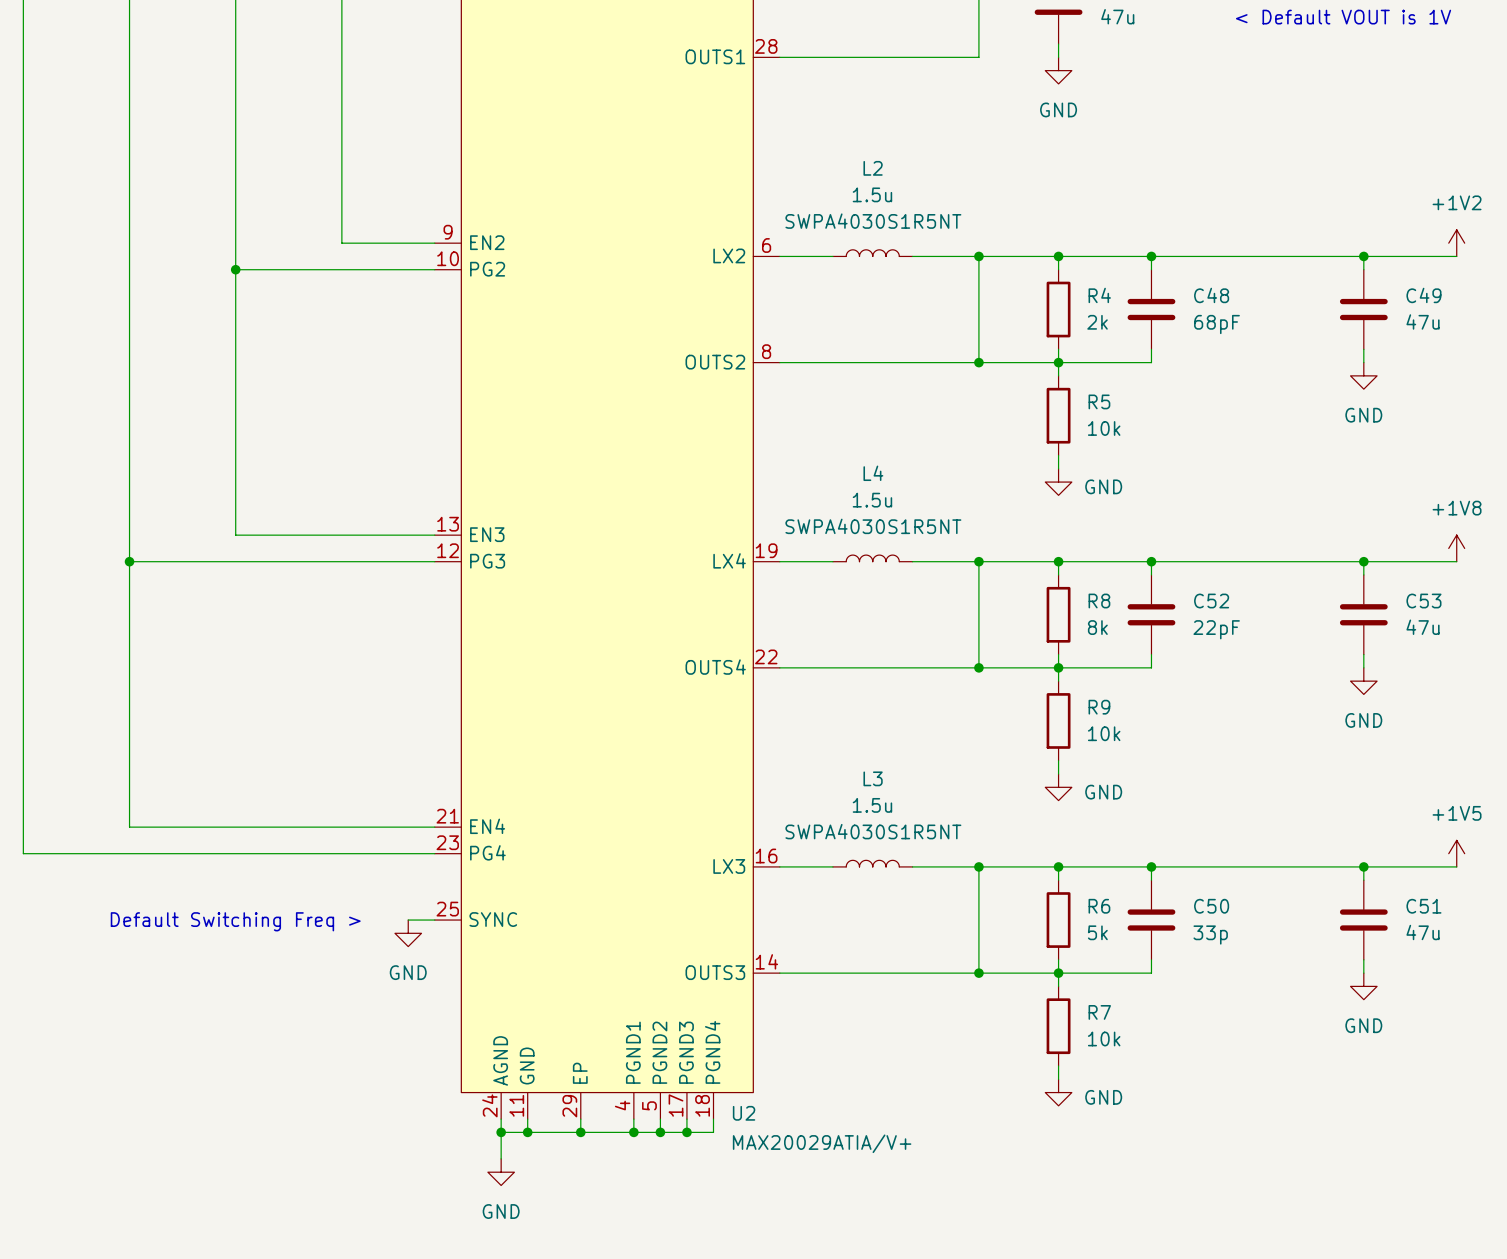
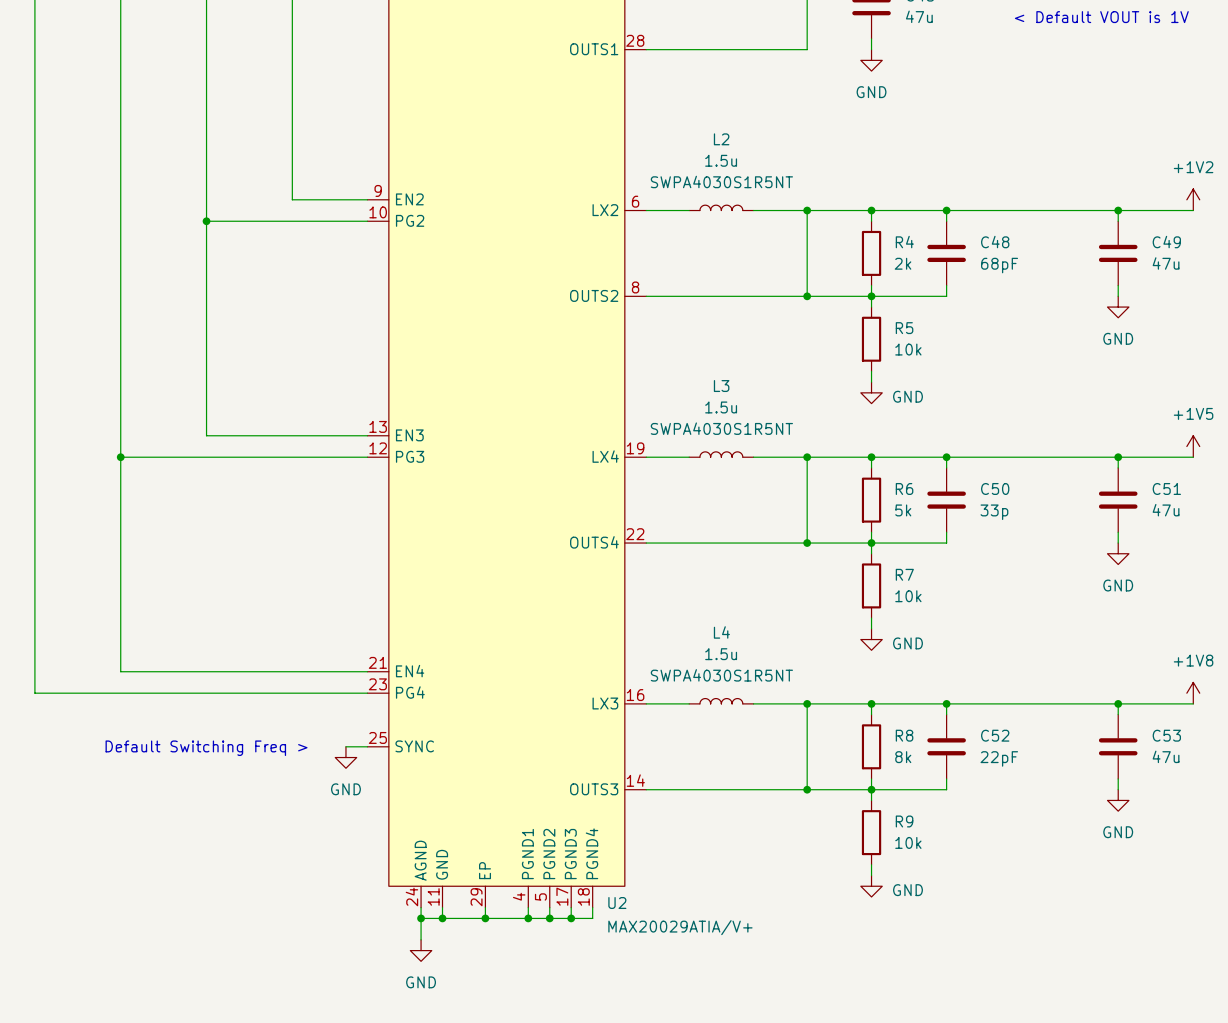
L4 name: L4 (873, 473) -> L3 (721, 386)
power symbol: +1V8 (1456, 548) -> +1V5 (1193, 446)
R8 name: R8 (1099, 601) -> R6 (904, 488)
C52 name: C52 (1211, 601) -> C50 (995, 488)
C53 name: C53 (1423, 601) -> C51 (1166, 488)
R8 value: 8k (1097, 627) -> 5k (903, 510)
C52 value: 22pF (1216, 629) -> 33p (994, 512)
R9 name: R9 (1099, 707) -> R7 (904, 574)
L3 name: L3 (873, 778) -> L4 (721, 632)
power symbol: +1V5 (1456, 853) -> +1V8 (1193, 693)
R6 name: R6 (1099, 906) -> R8 (904, 735)
C50 name: C50 (1211, 906) -> C52 (995, 735)
C51 name: C51 (1423, 906) -> C53 (1166, 735)
R6 value: 5k (1097, 932) -> 8k (903, 757)
C50 value: 33p (1210, 935) -> 22pF (999, 758)
R7 name: R7 (1099, 1012) -> R9 (904, 821)

